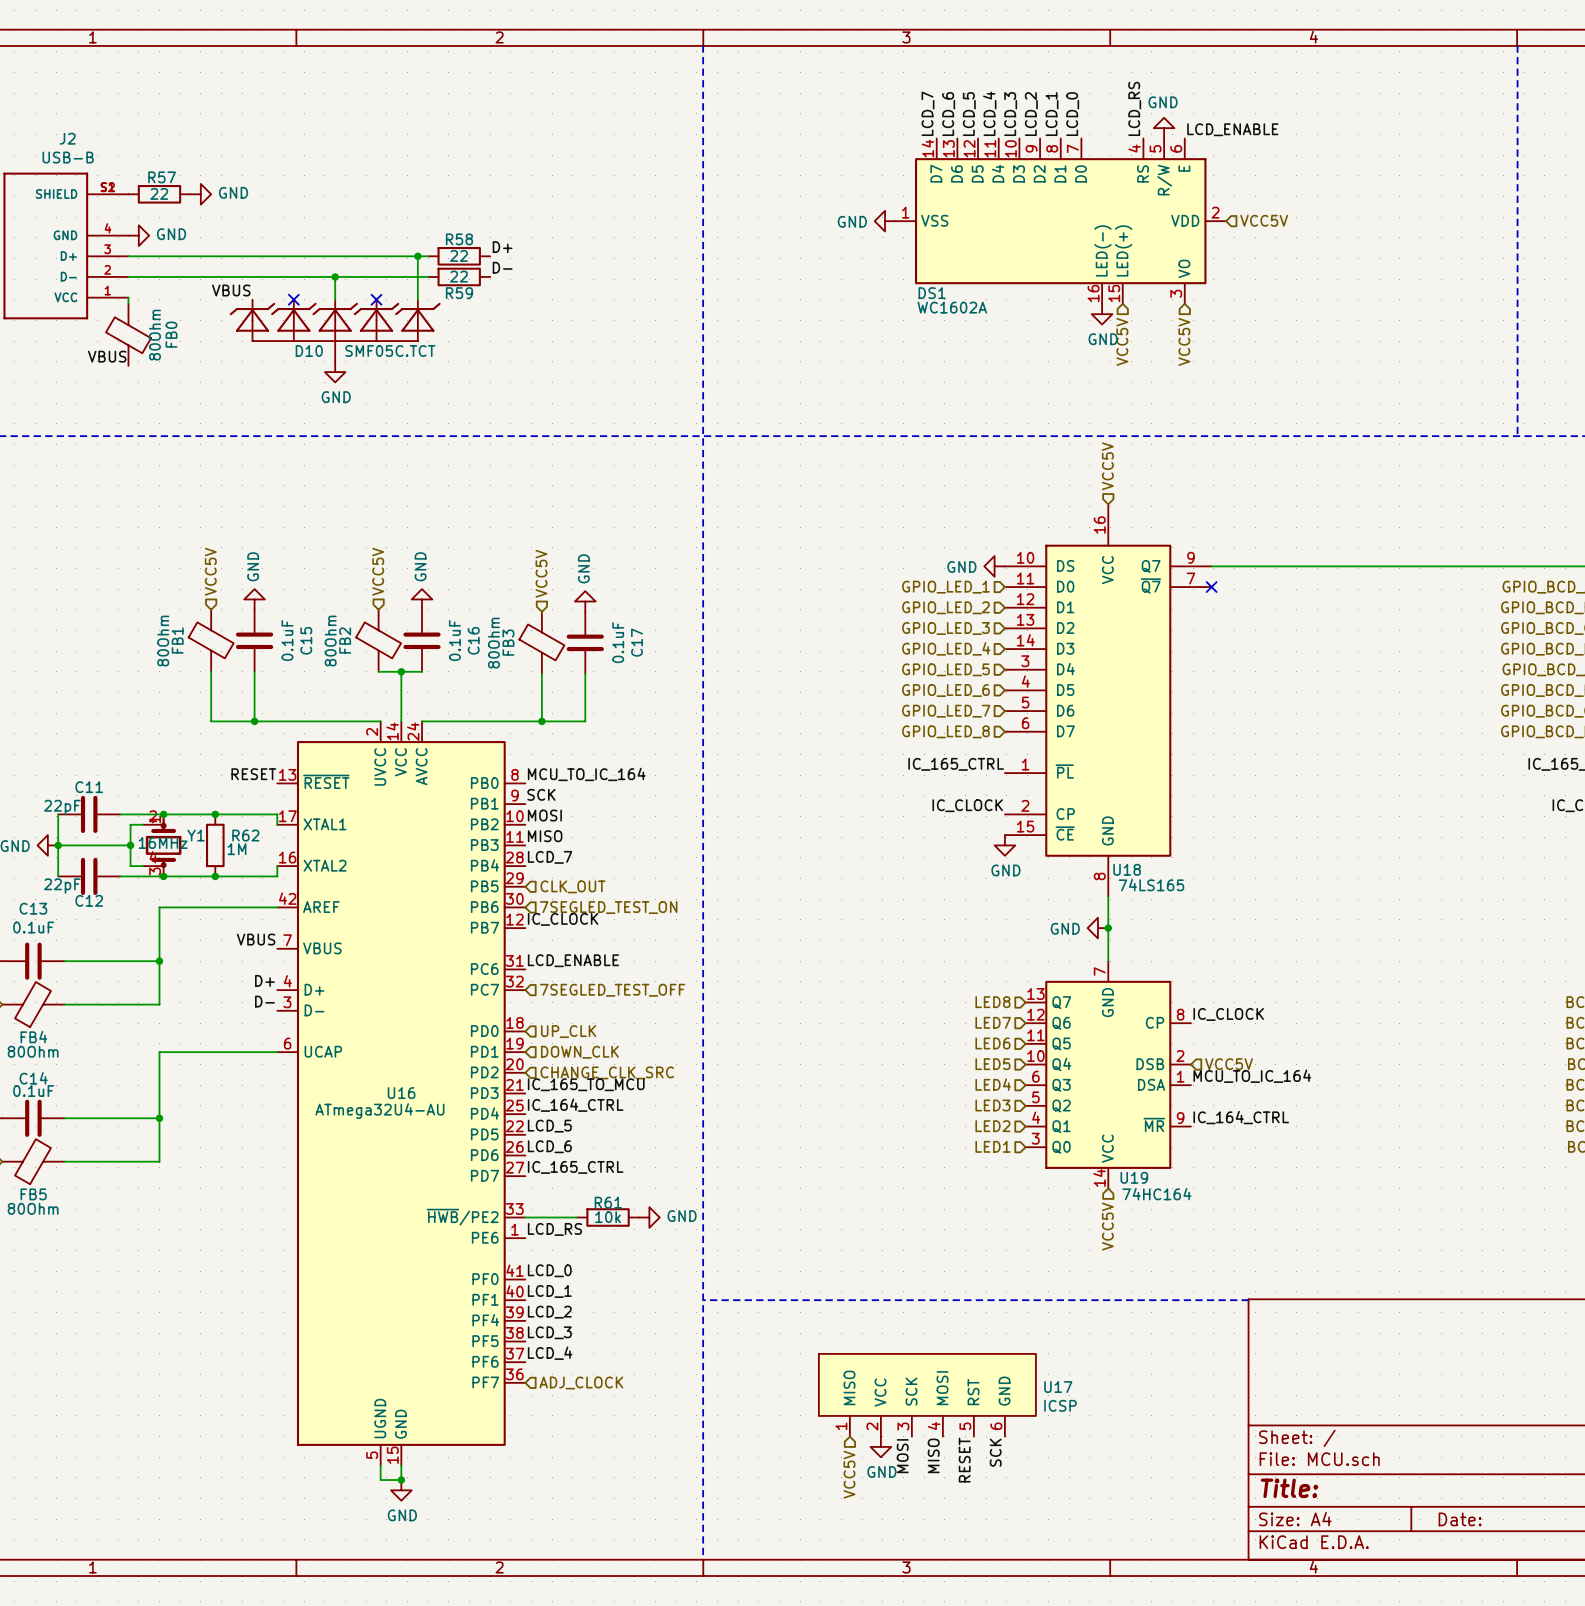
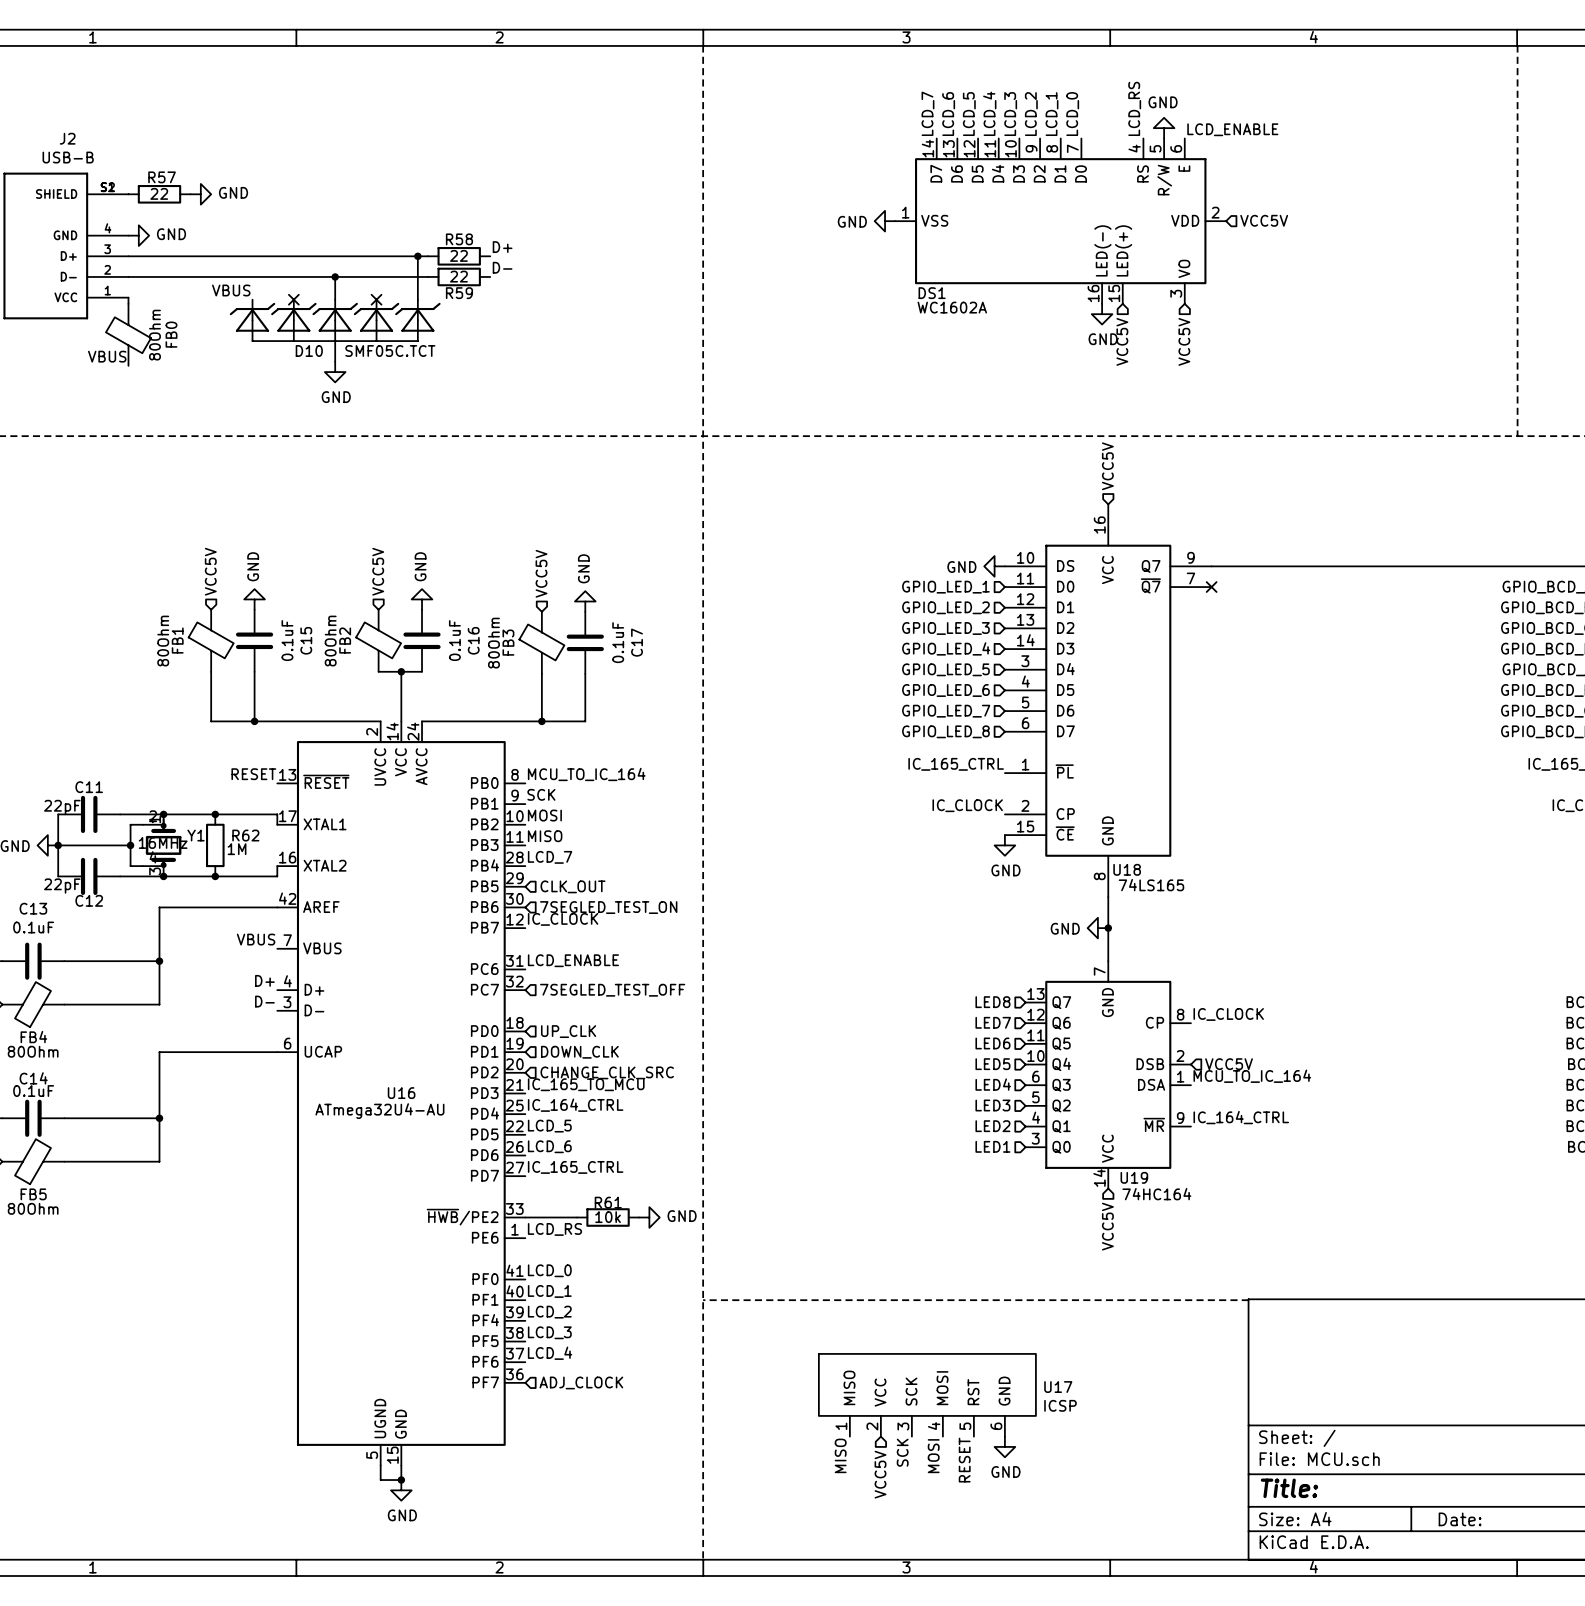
power symbol position: GND (880, 1446) -> GND (1004, 1446)
label: SCK (995, 1452) -> none
label: none -> MISO (840, 1455)
label: MISO (933, 1455) -> MOSI (933, 1456)
label: MOSI (902, 1456) -> SCK (902, 1452)
hierarchical label position: VCC5V (849, 1474) -> VCC5V (880, 1474)

